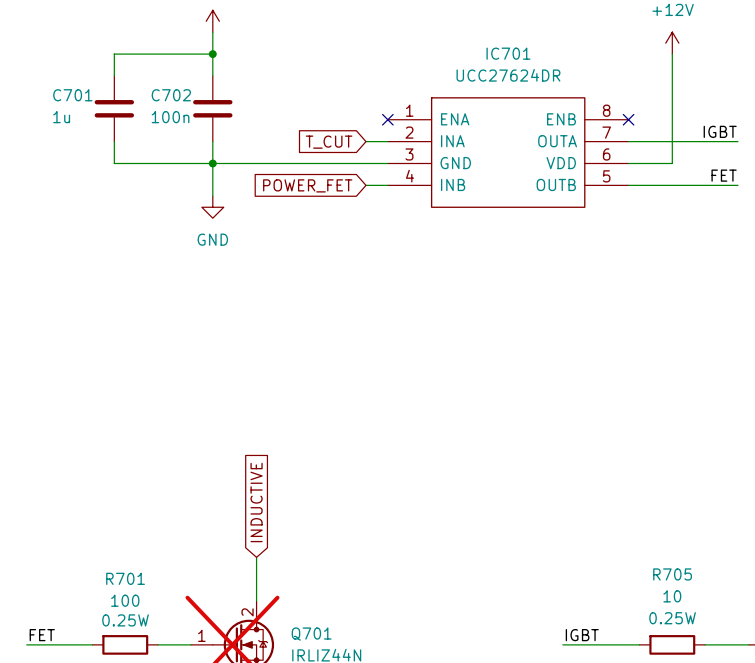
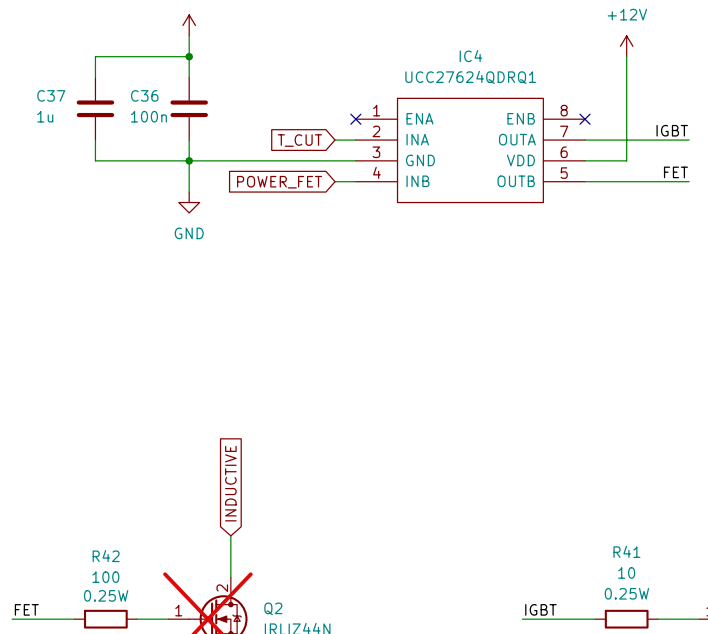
IC701 name: IC701 (508, 53) -> IC4 (470, 56)
IC701 value: UCC27624DR (508, 75) -> UCC27624QDRQ1 (470, 77)
C701 name: C701 (72, 95) -> C37 (51, 95)
C702 name: C702 (171, 95) -> C36 (144, 95)
R705 name: R705 (672, 574) -> R41 (626, 551)
R701 name: R701 (125, 578) -> R42 (106, 556)
Q701 name: Q701 (311, 634) -> Q2 (273, 608)

